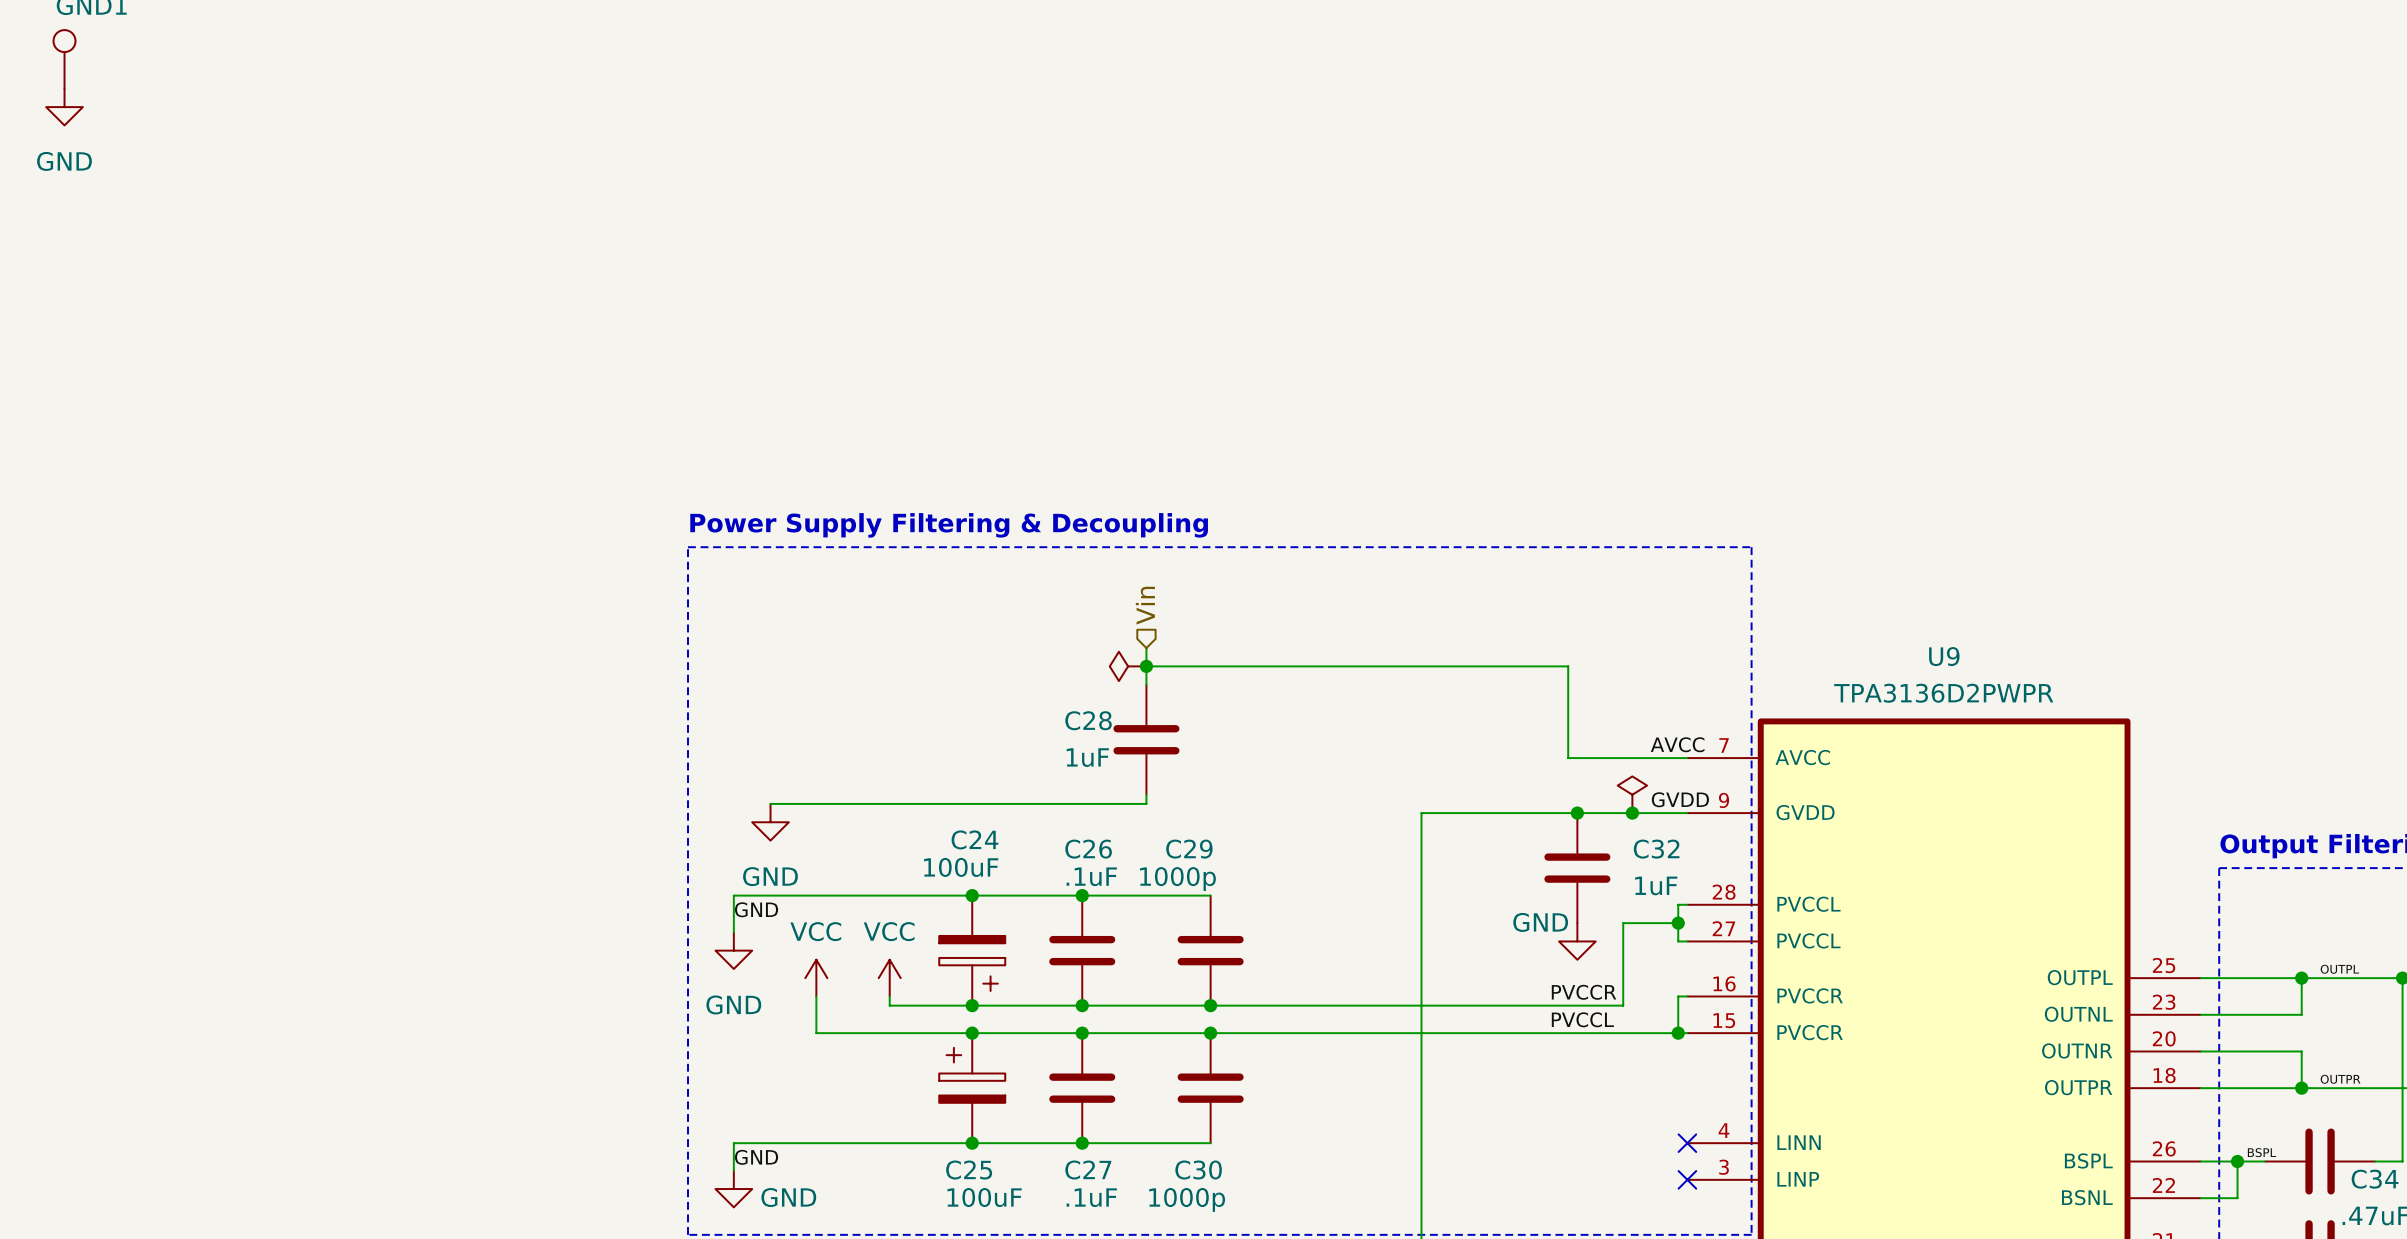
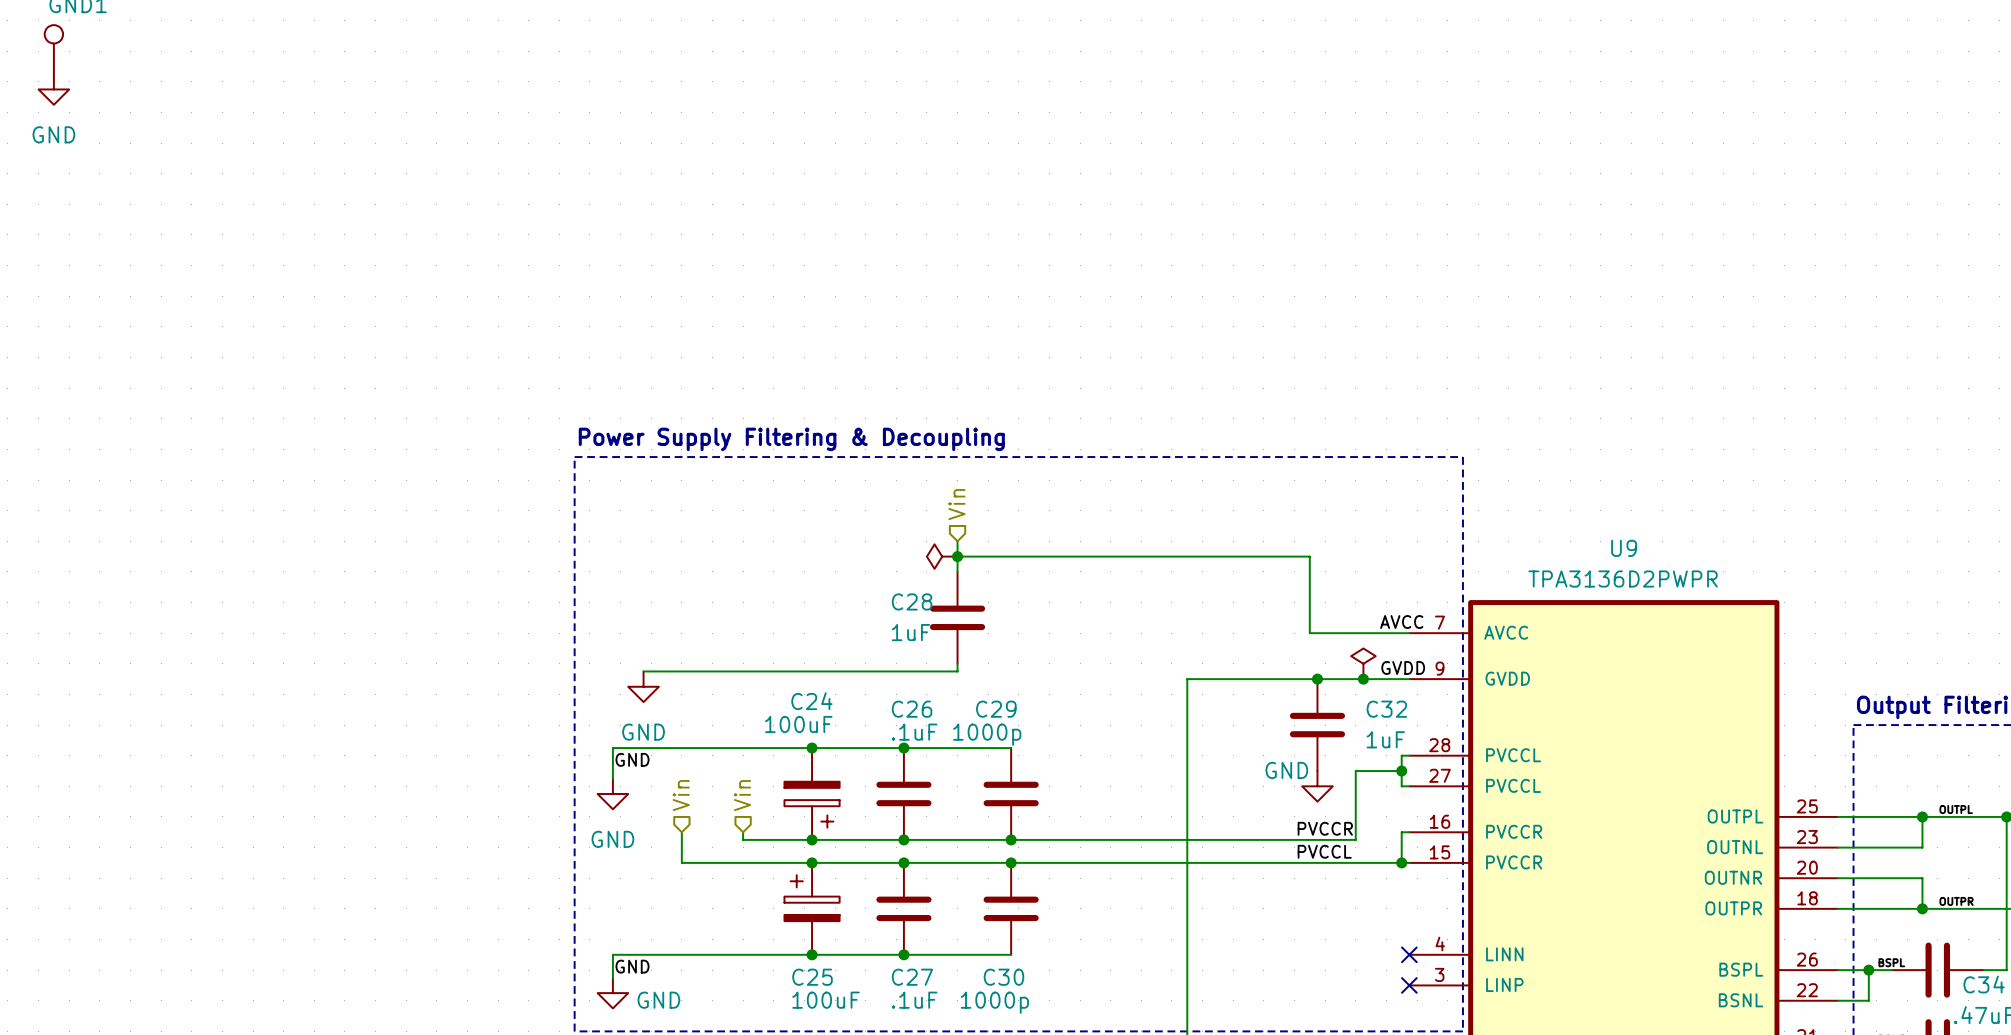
hierarchical label: none -> Vin (681, 795)
hierarchical label: none -> Vin (742, 795)
power symbol: VCC (816, 978) -> none
power symbol: VCC (889, 978) -> none

